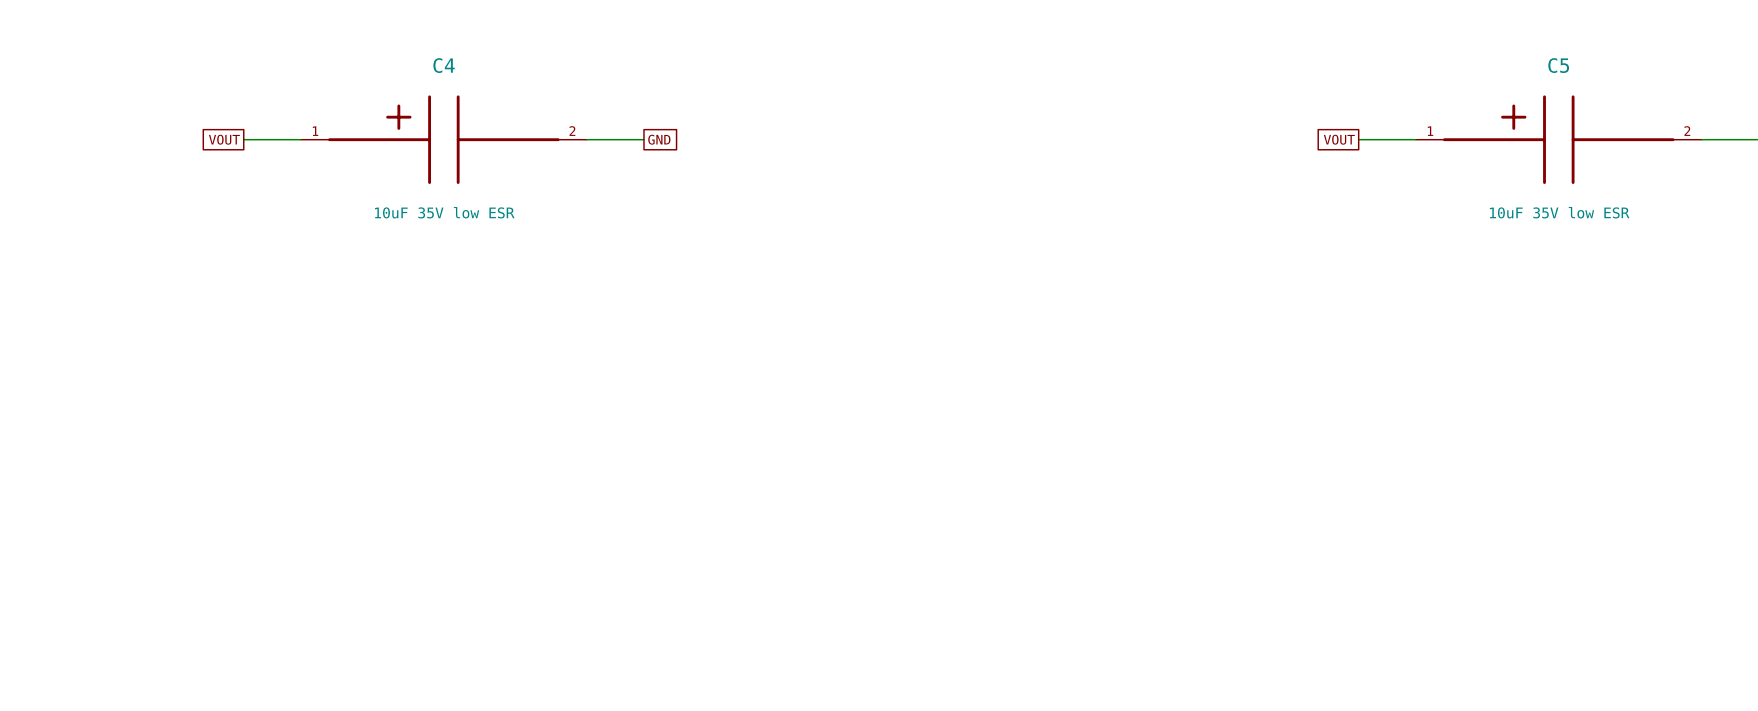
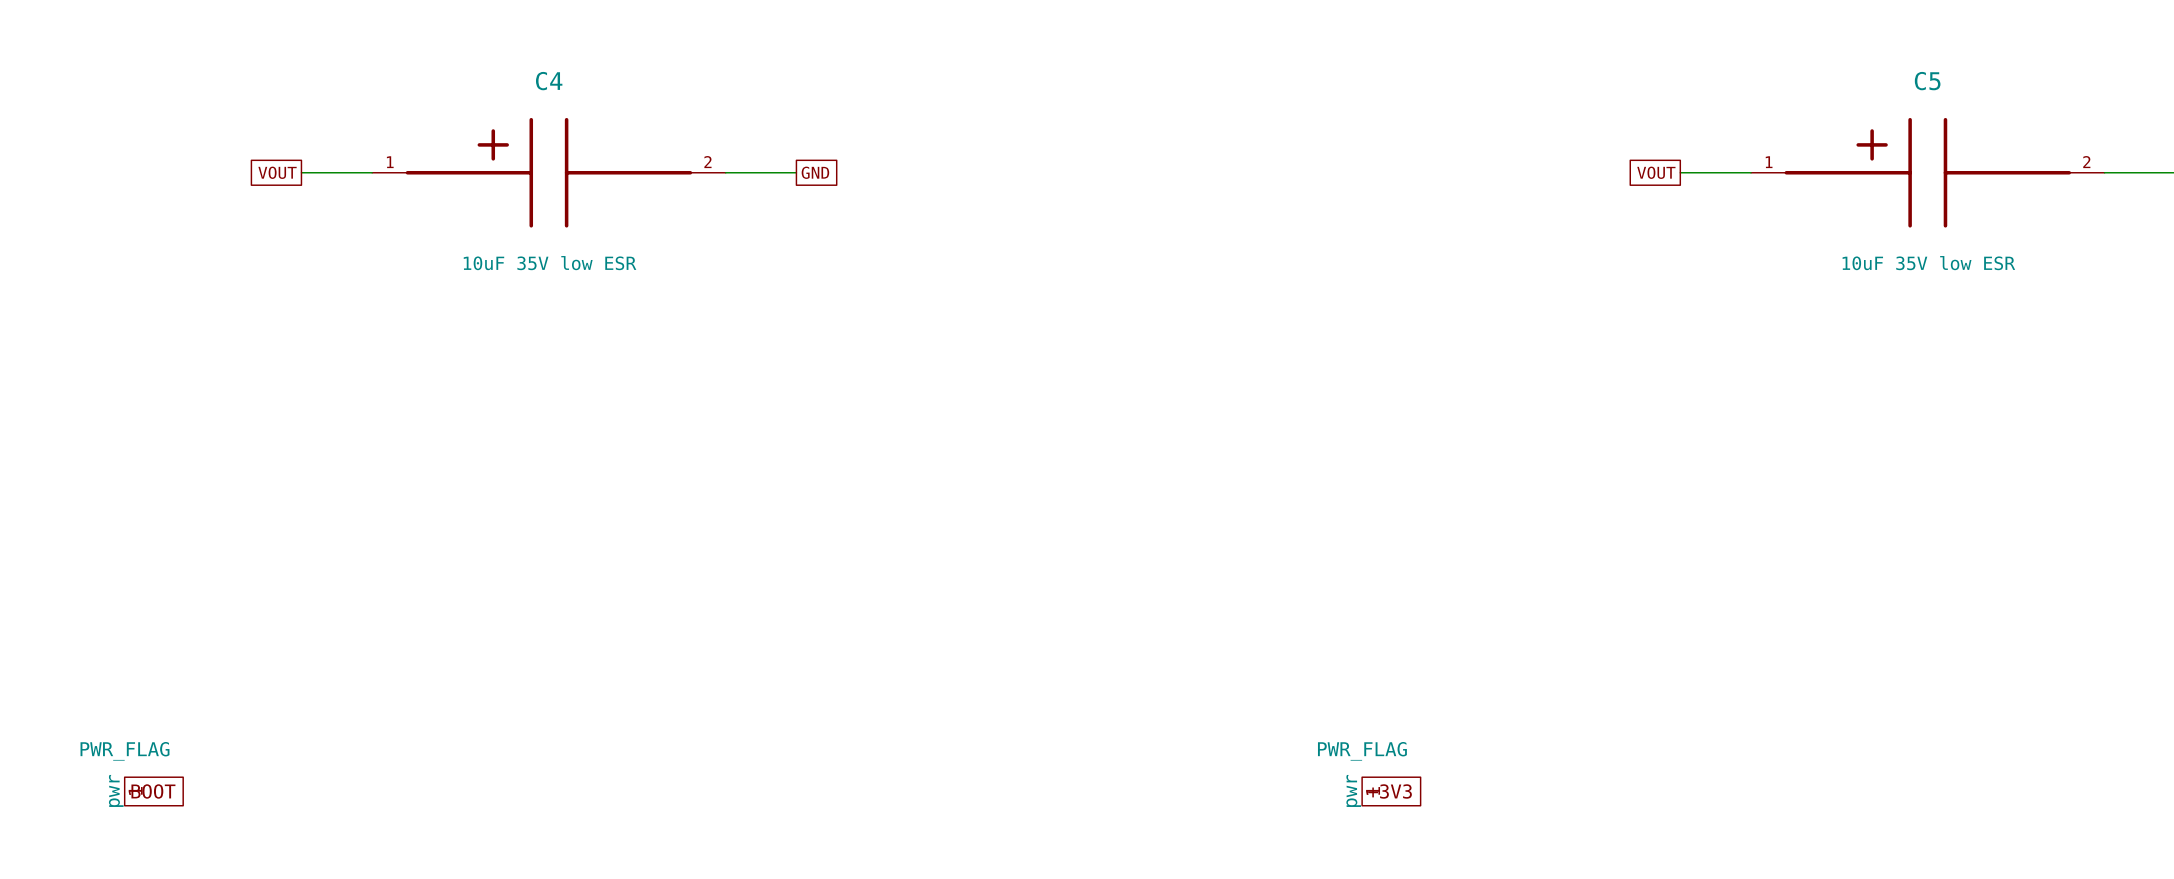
power symbol: none -> PWR_FLAG (124, 774)
power symbol: none -> PWR_FLAG (1362, 774)
global label: none -> BOOT (153, 791)
global label: none -> +3V3 (1390, 791)

